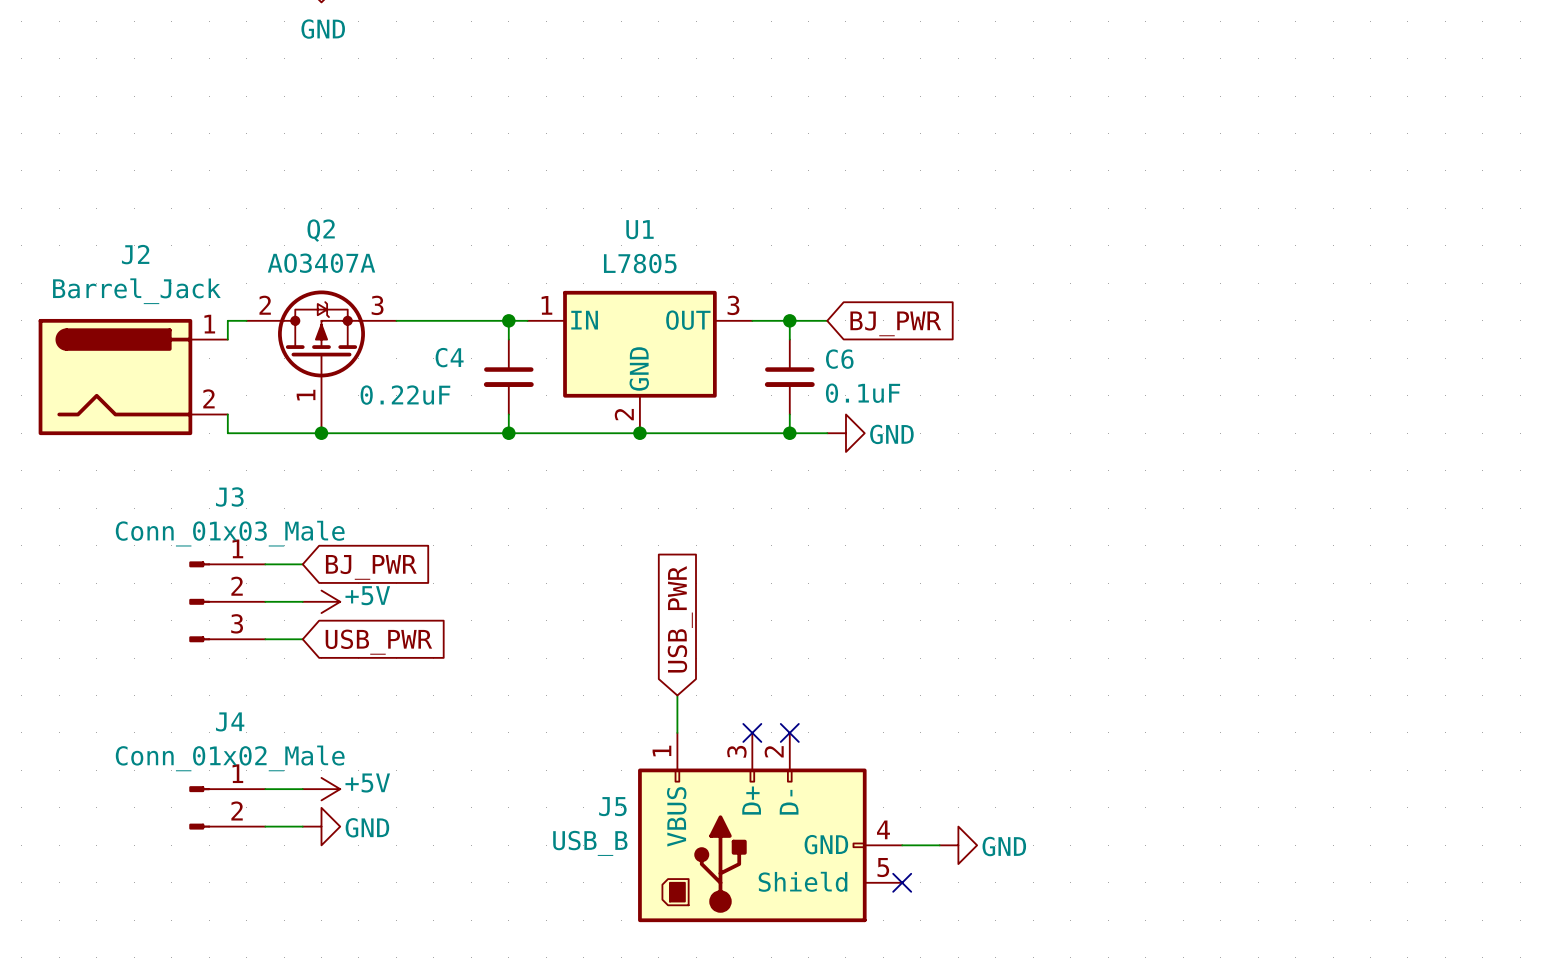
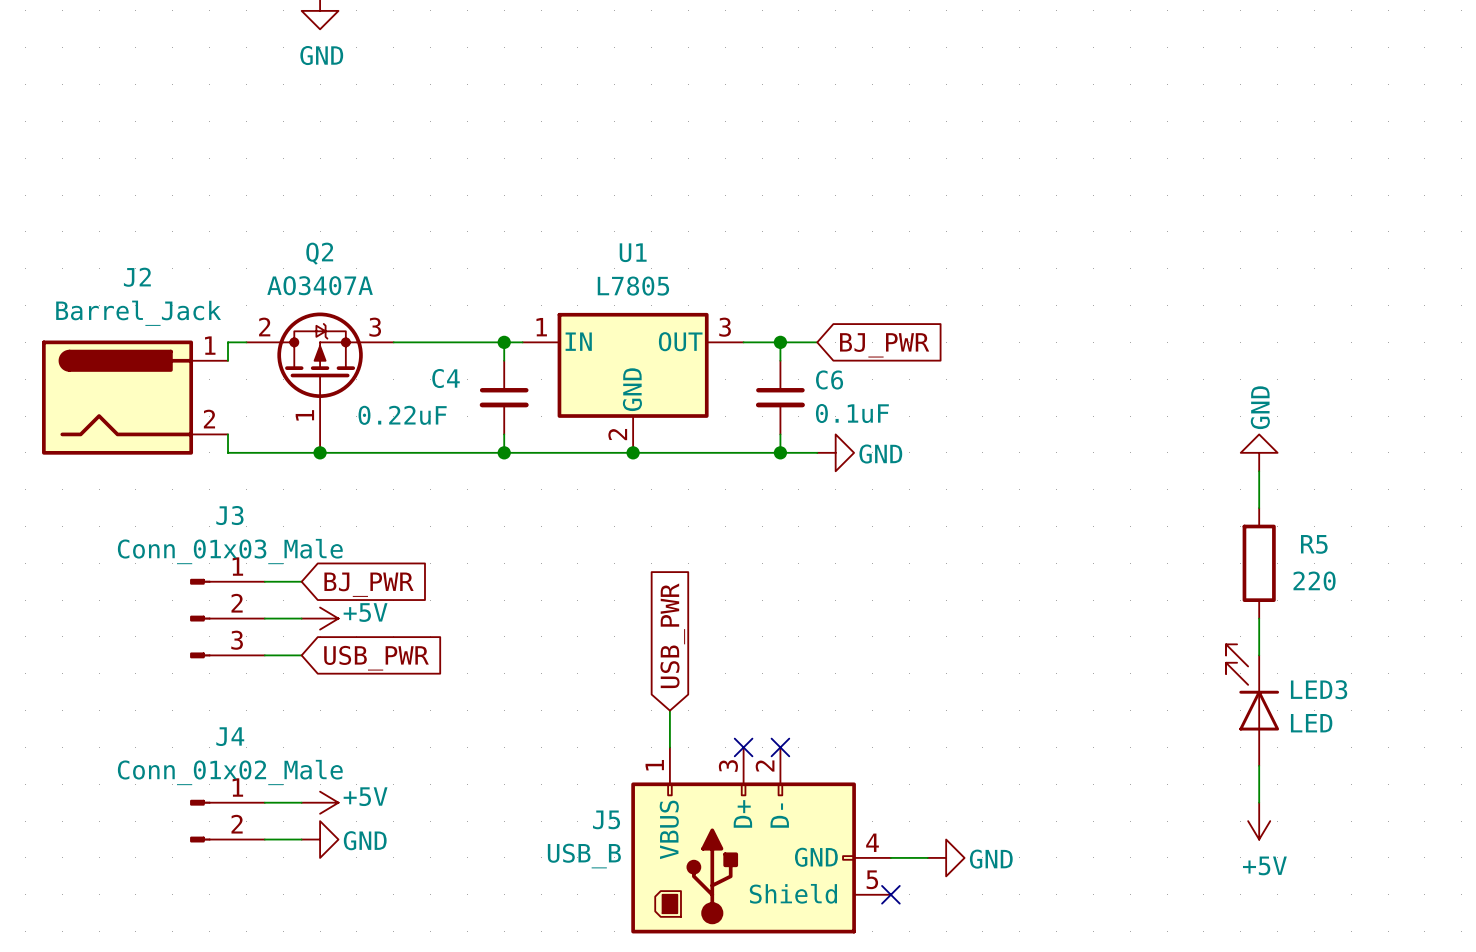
power symbol: none -> GND (1259, 452)
wire: none -> (1259, 471) (1259, 508)
R5: none -> 220 (1259, 563)
wire: none -> (1259, 618) (1259, 655)
LED3: none -> LED (1252, 705)
wire: none -> (1259, 765) (1259, 802)
power symbol: none -> +5V (1259, 821)

